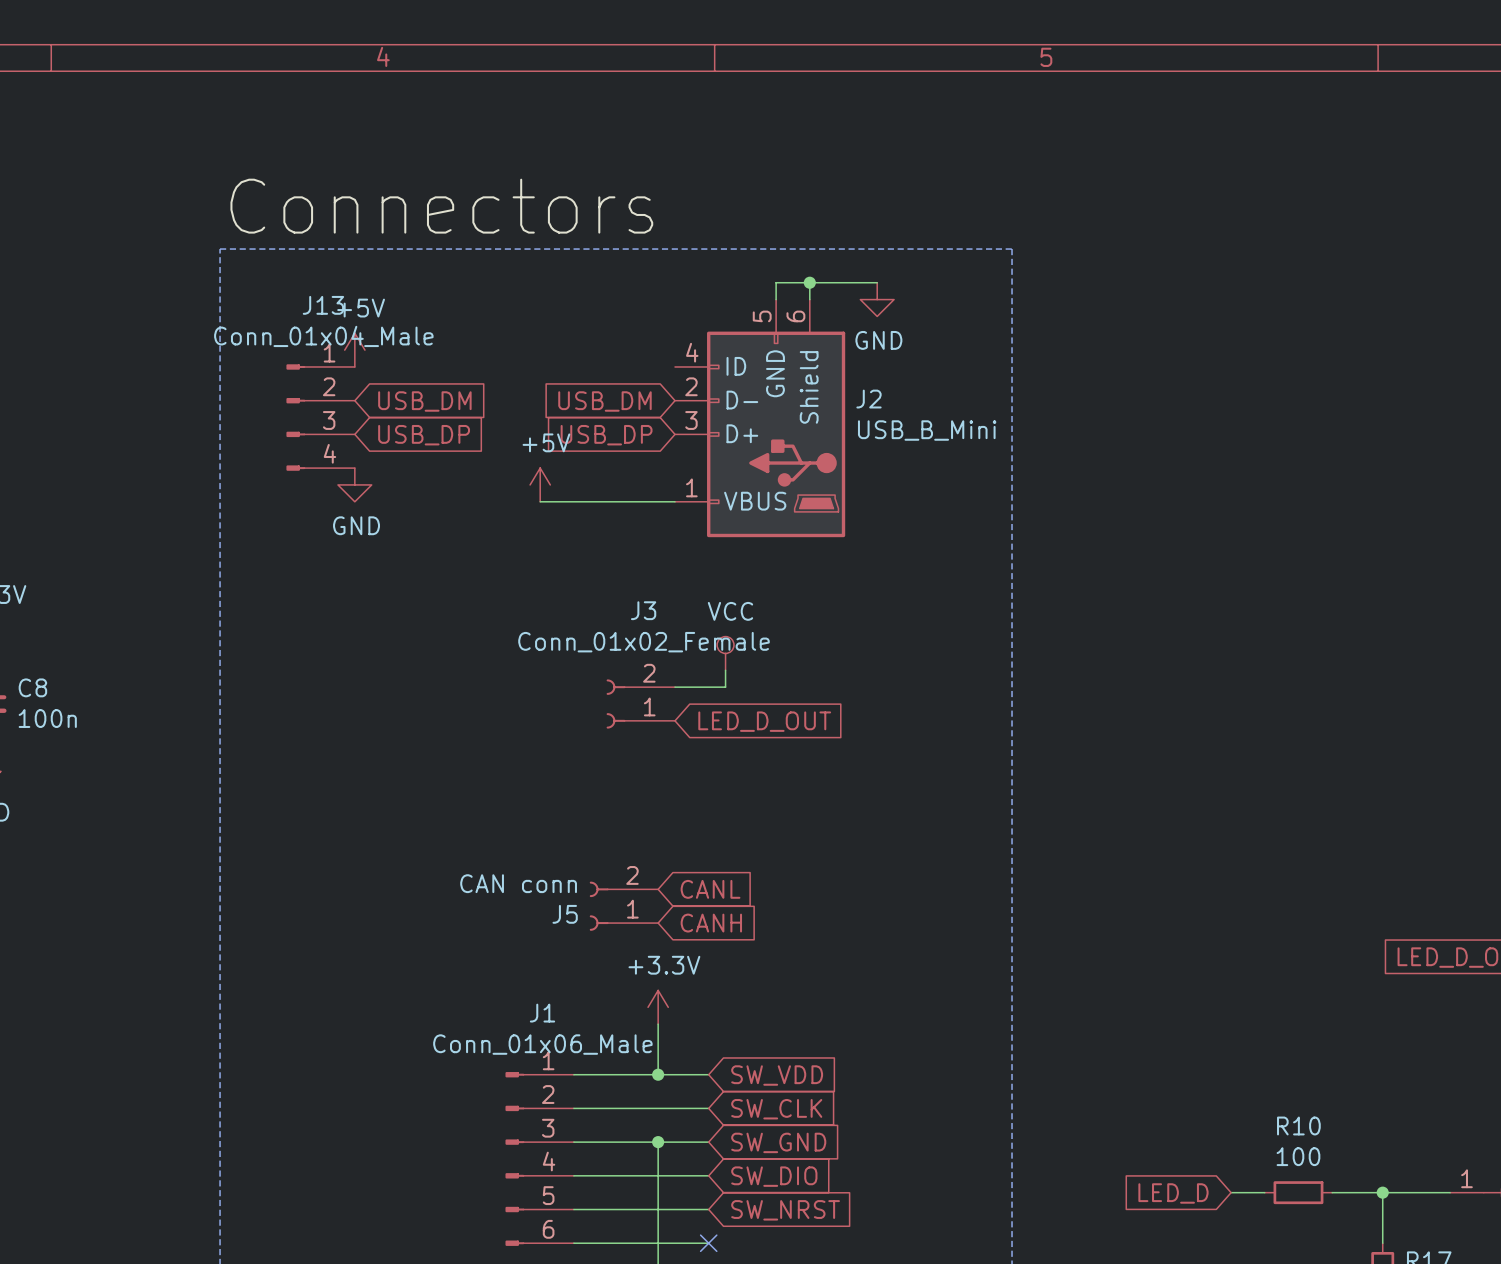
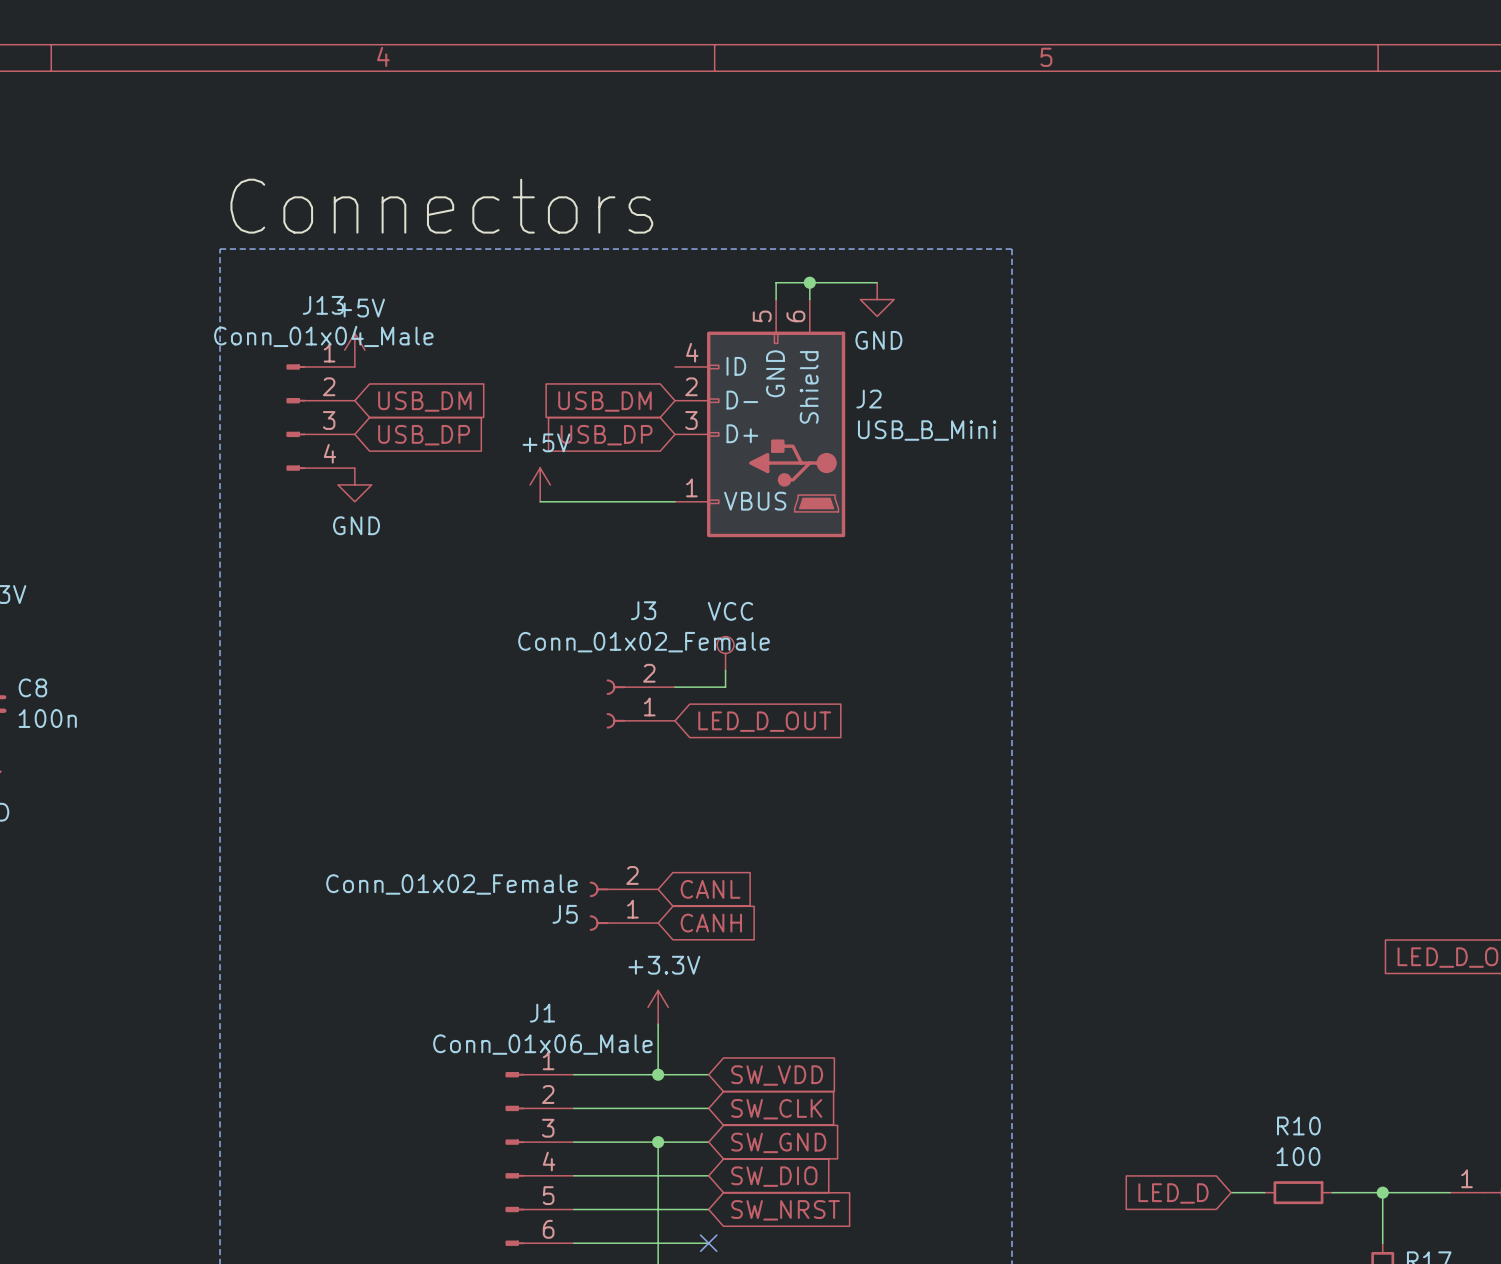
J5 value: CAN conn (518, 883) -> Conn_01x02_Female (452, 884)

